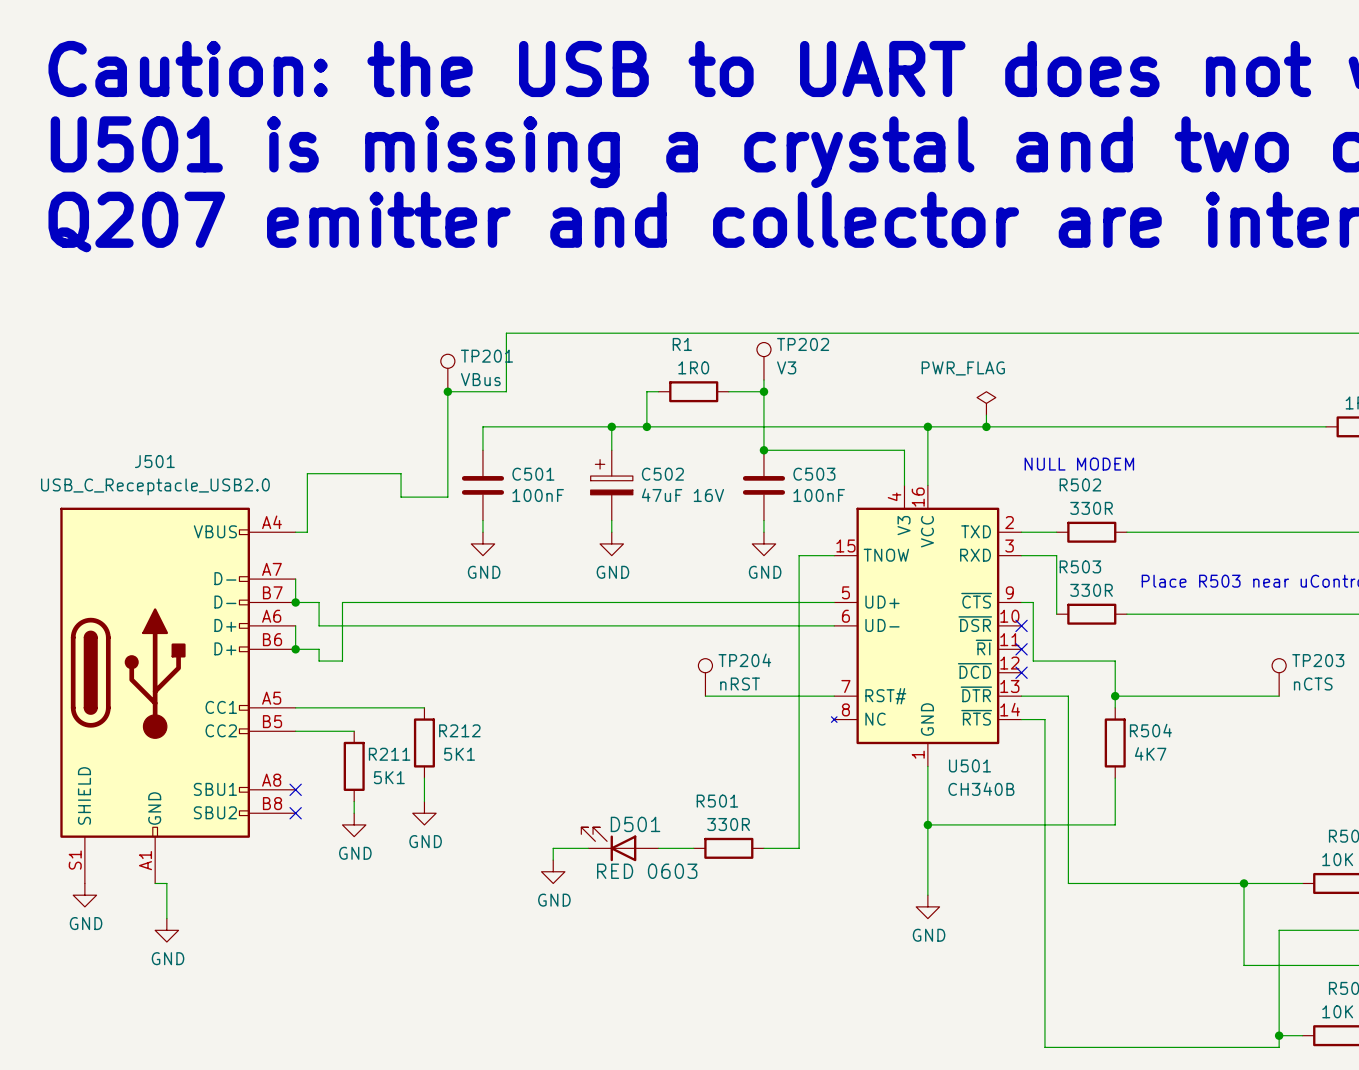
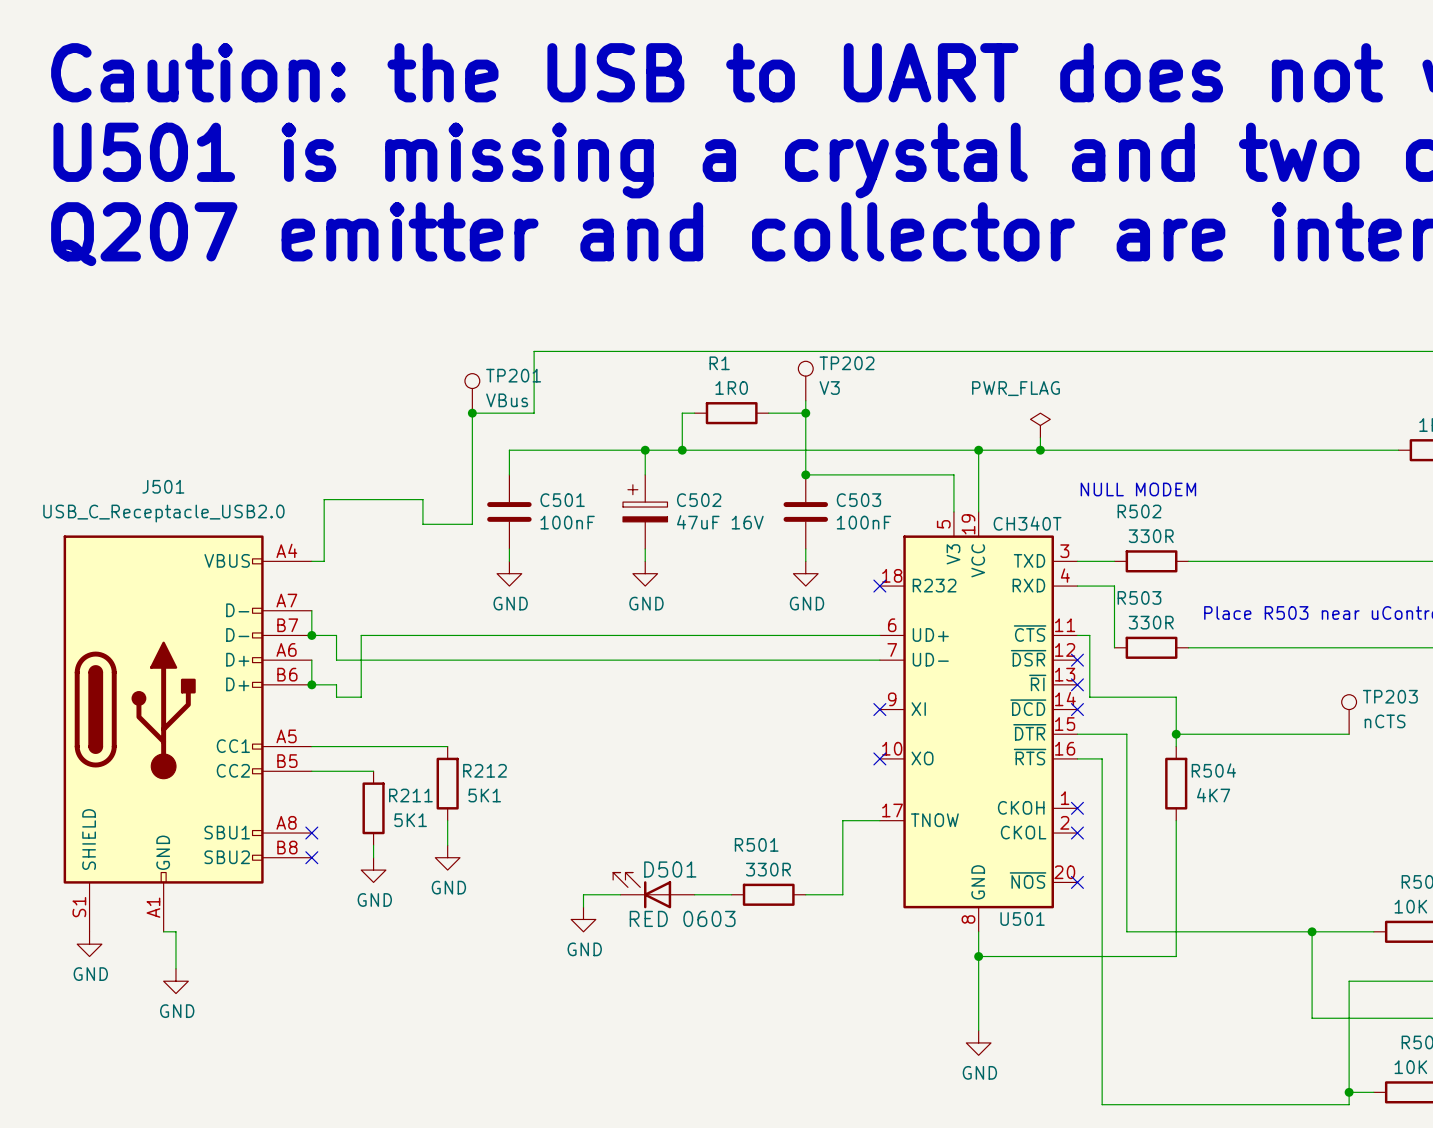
U501 symbol: [831, 485, 1022, 767] -> [879, 511, 1078, 932]
wire: (834, 555) (799, 555) (799, 778) -> (879, 820) (842, 820)
no-connect mark: none -> (879, 586)
no-connect mark: none -> (879, 709)
TP204: nRST (705, 677) -> none
wire: (705, 696) (834, 696) -> none
no-connect mark: none -> (879, 758)
U501 name position: U501 (969, 765) -> U501 (1022, 919)
no-connect mark: none -> (1077, 808)
U501 value: CH340B (981, 789) -> CH340T (1027, 523)
no-connect mark: none -> (1077, 833)
wire: (927, 824) (1115, 824) -> (978, 956) (1176, 956) (1176, 870)
junction: (927, 824) -> none
no-connect mark: none -> (1077, 882)
wire: none -> (978, 944) (978, 1030)
junction: none -> (978, 956)
power symbol position: GND (927, 906) -> GND (978, 1042)

